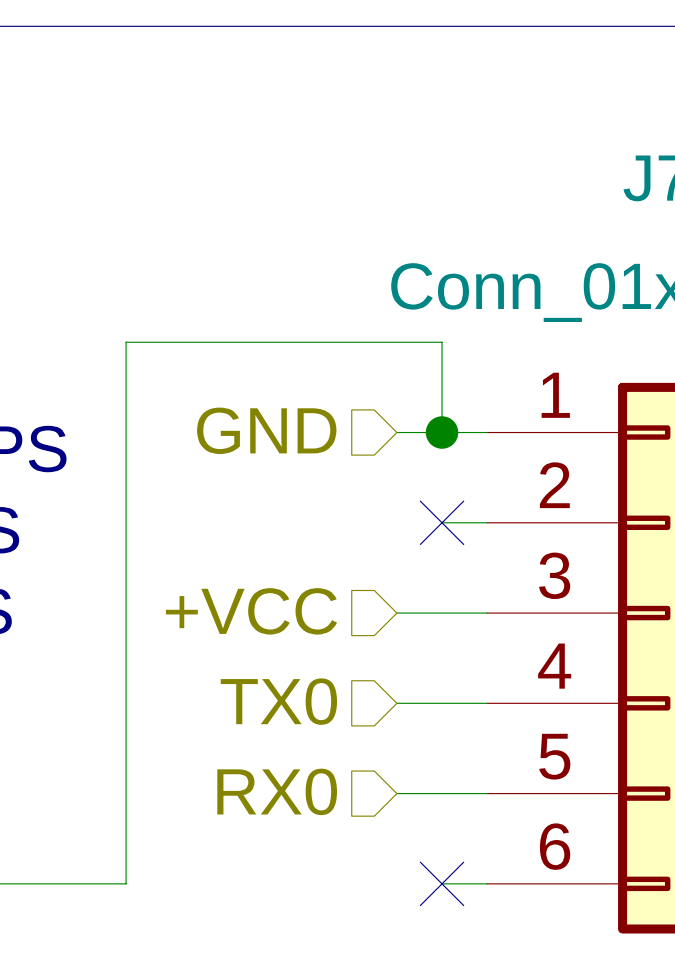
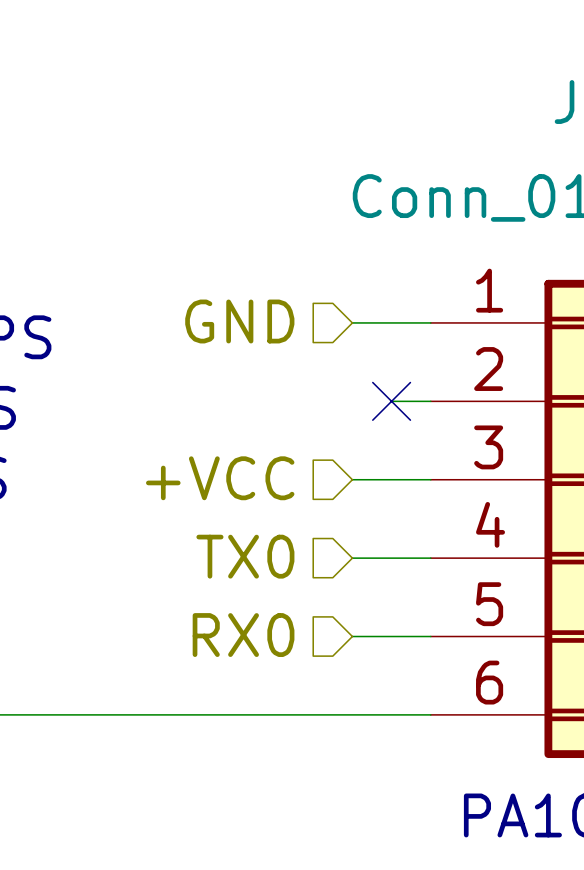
wire: (442, 432) (442, 342) (126, 342) (126, 883) -> (391, 714) (117, 714)
junction: (442, 432) -> none
no-connect mark: (442, 883) -> none

